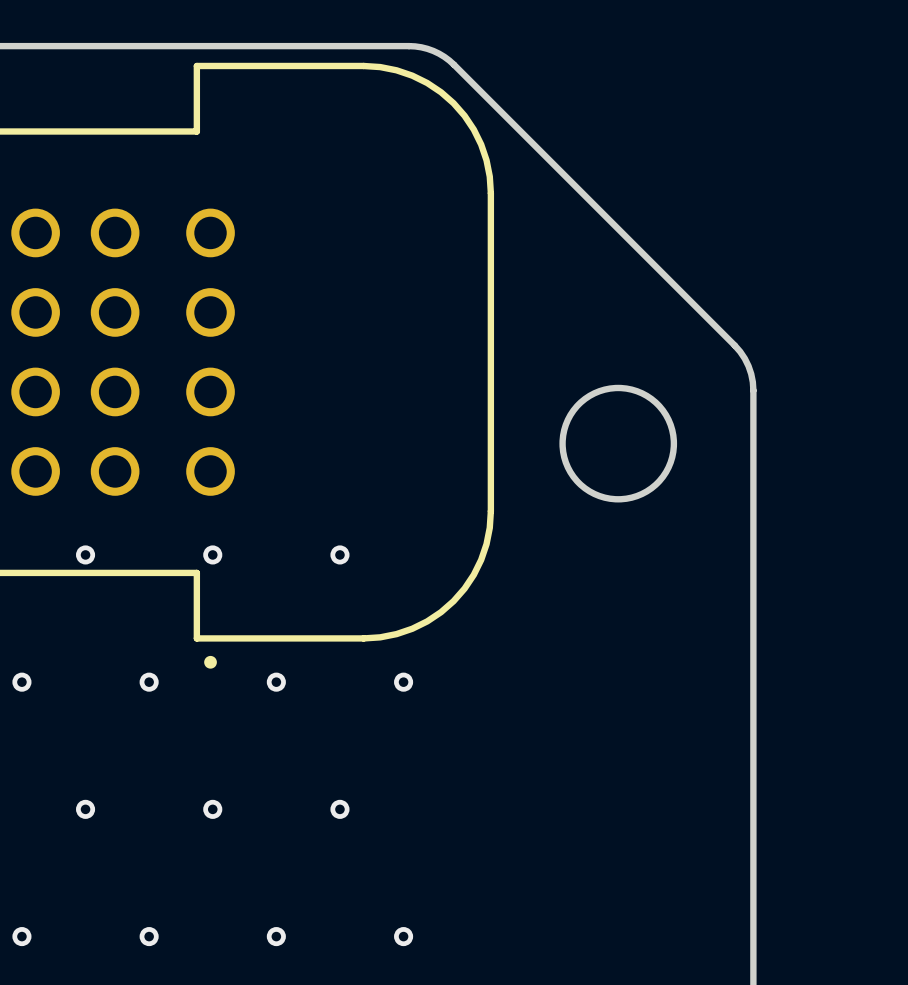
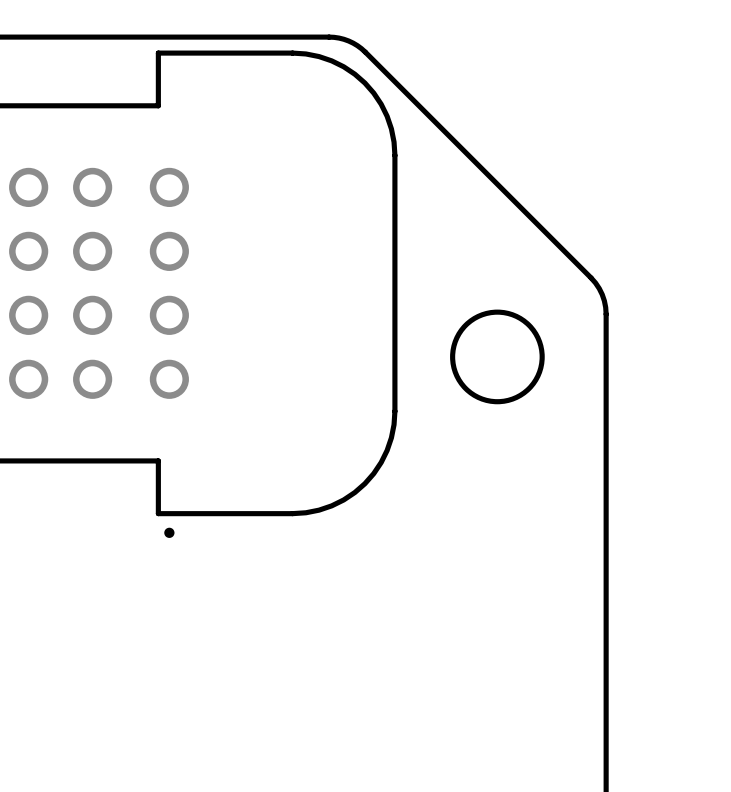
via: (85, 554) -> none
via: (212, 554) -> none
via: (339, 554) -> none
via: (21, 682) -> none
via: (149, 682) -> none
via: (276, 682) -> none
via: (403, 682) -> none
via: (85, 809) -> none
via: (212, 809) -> none
via: (339, 809) -> none
via: (21, 936) -> none
via: (149, 936) -> none
via: (276, 936) -> none
via: (403, 936) -> none

